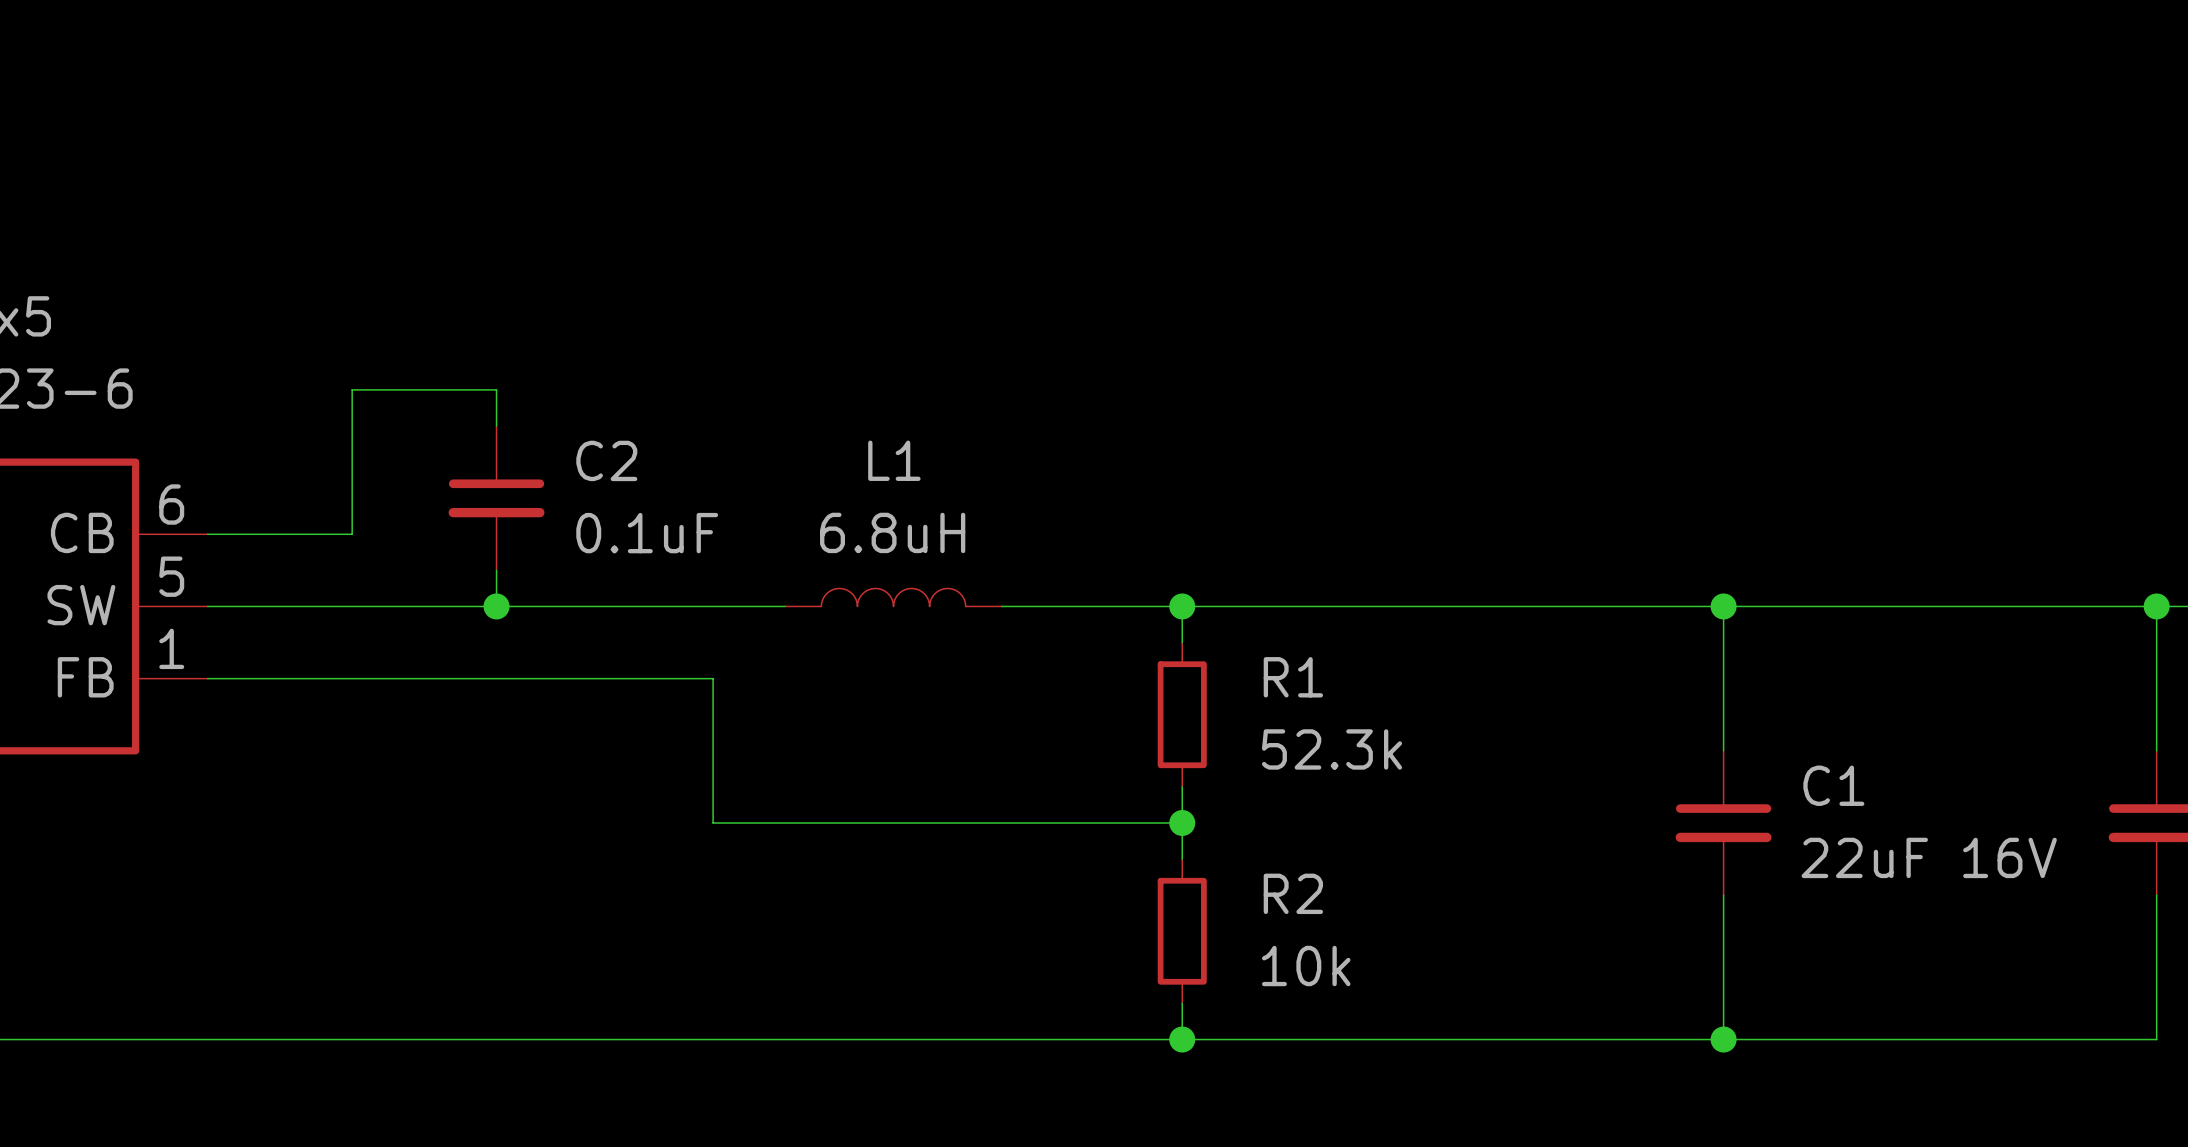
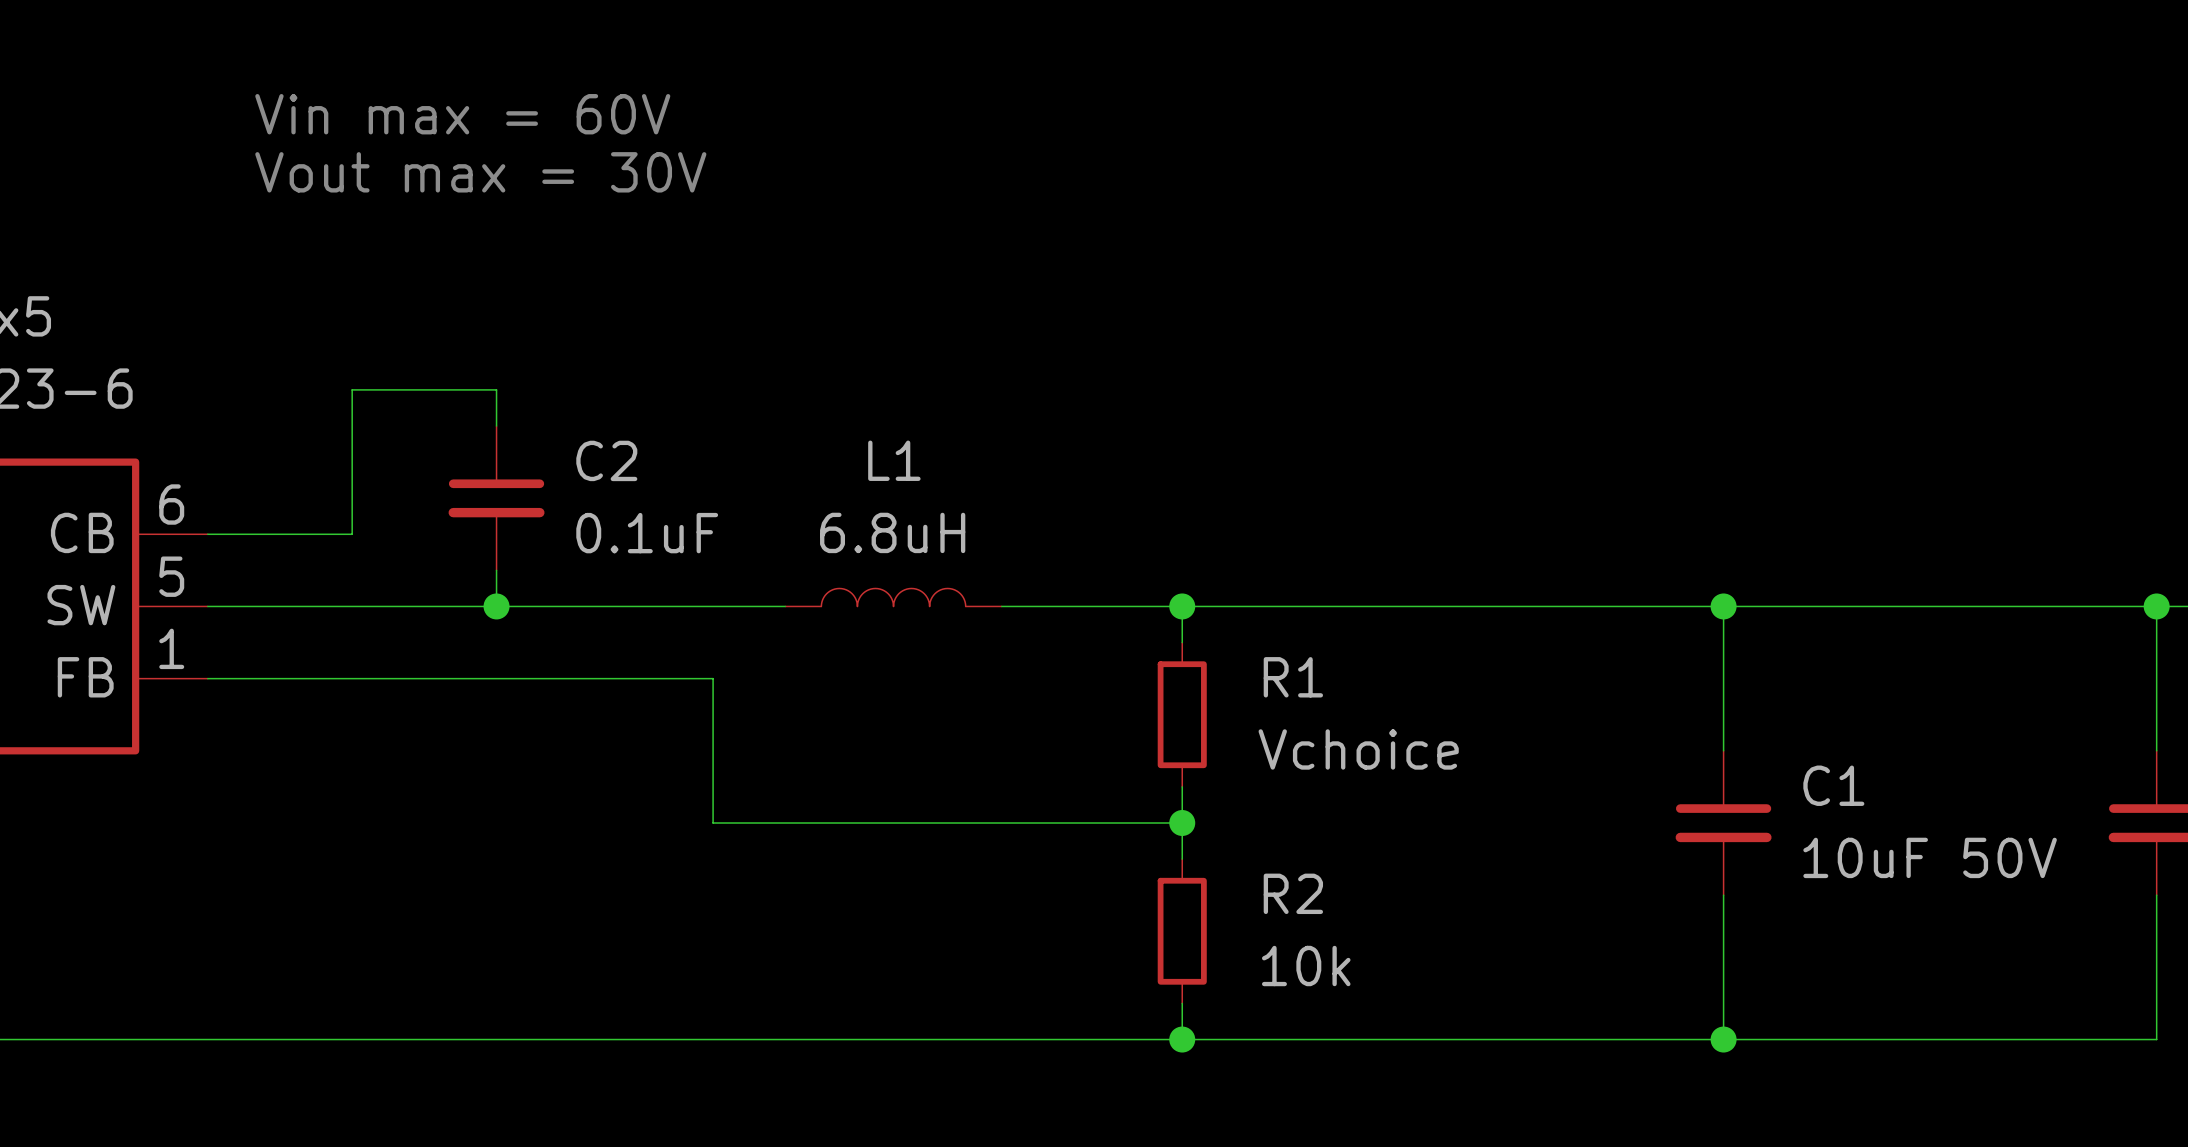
text: none -> Vin max = 60V (462, 114)
text: none -> Vout max = 30V (480, 172)
R1 value: 52.3k (1332, 749) -> Vchoice (1358, 749)
C1 value: 22uF 16V (1929, 857) -> 10uF 50V (1930, 857)

